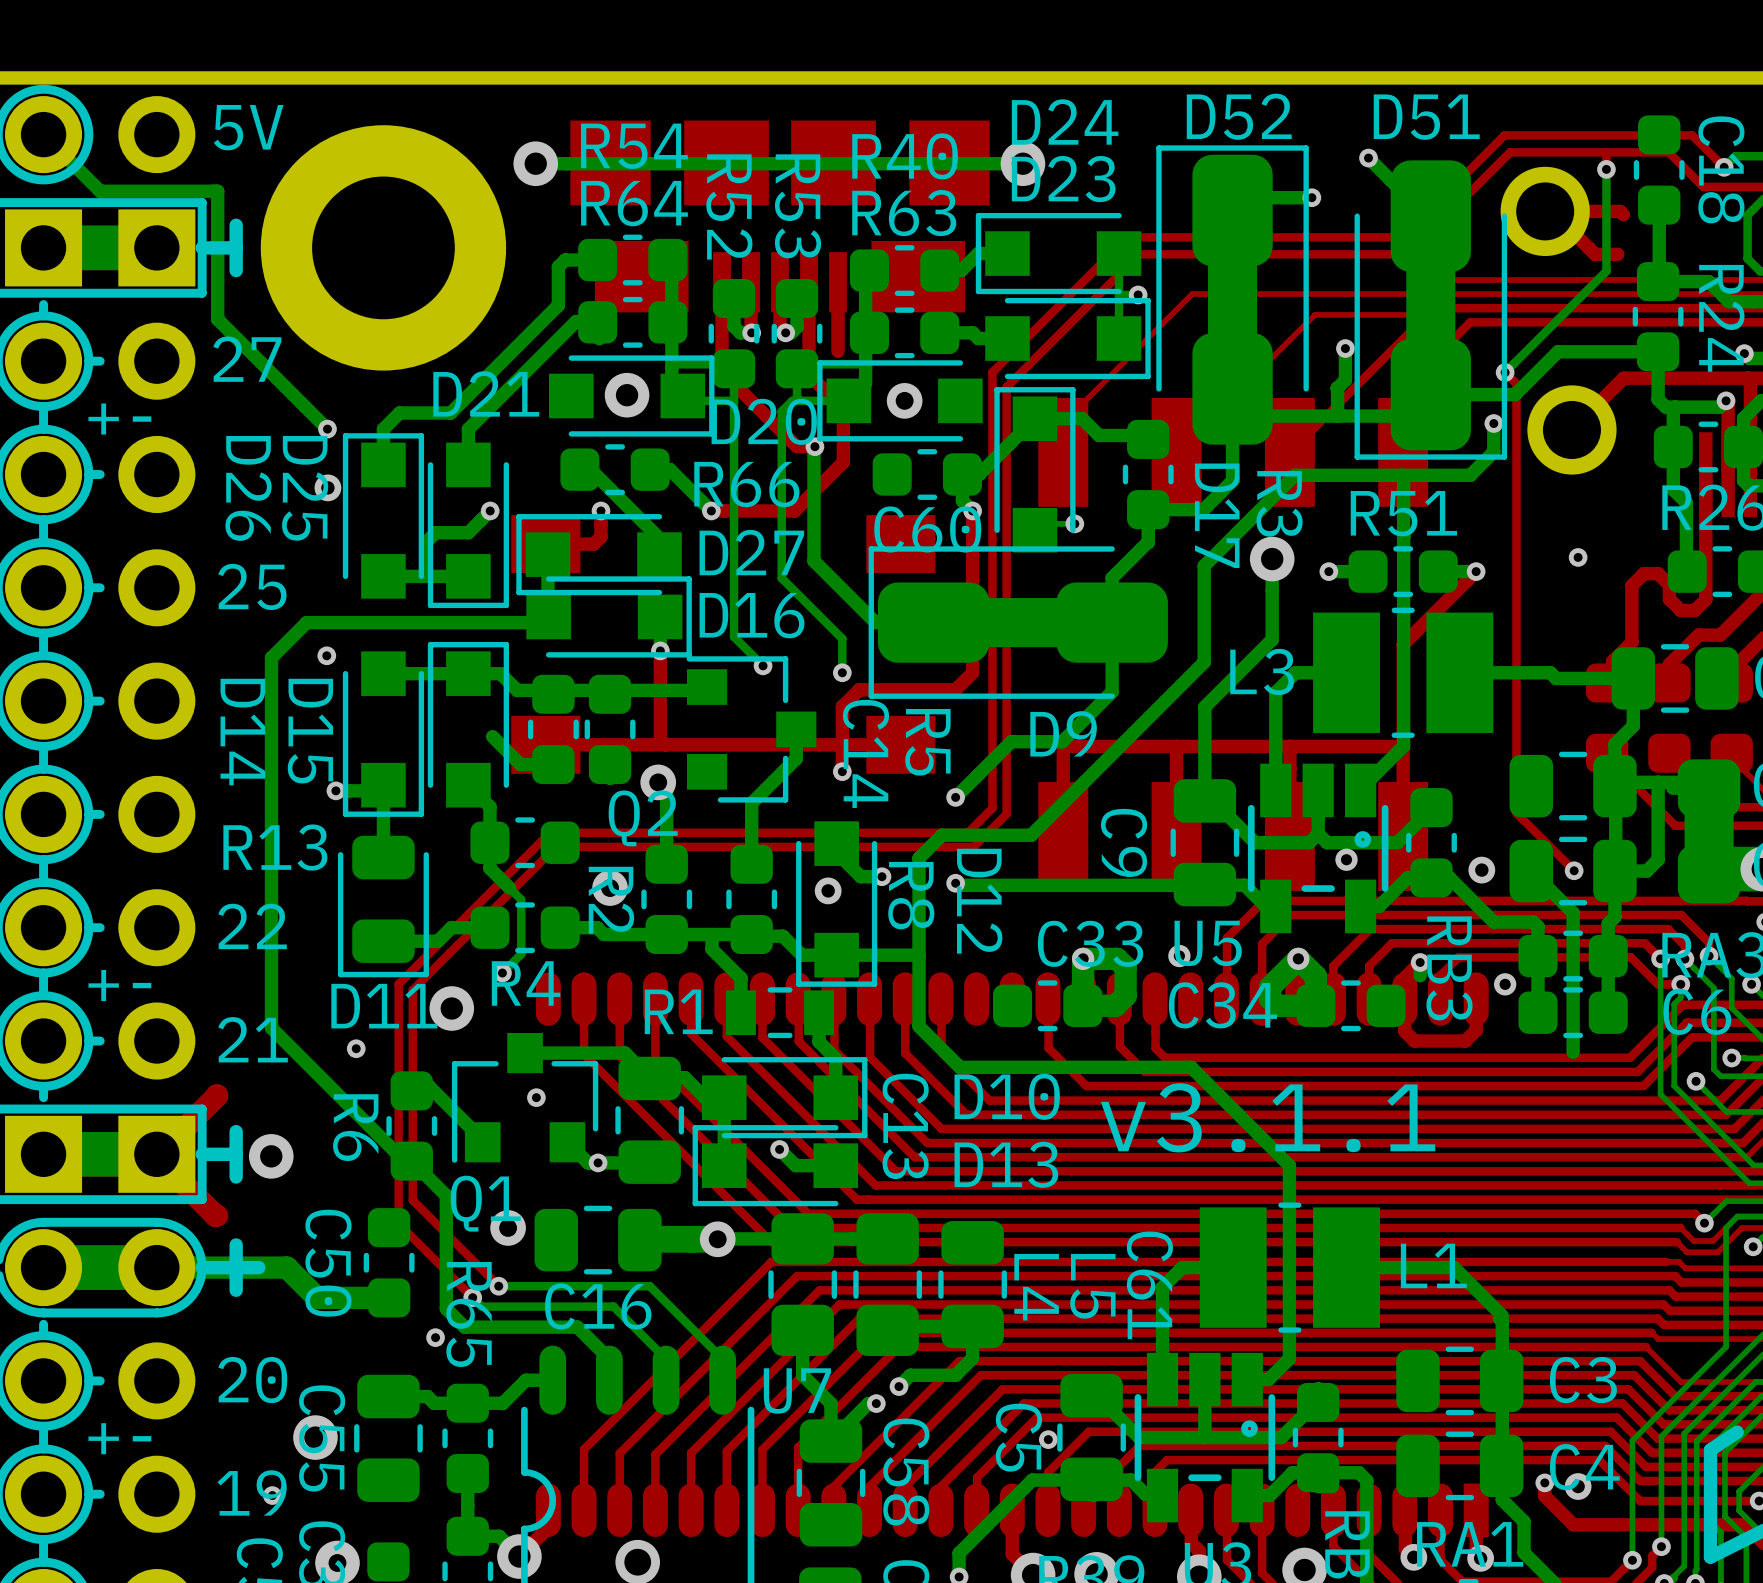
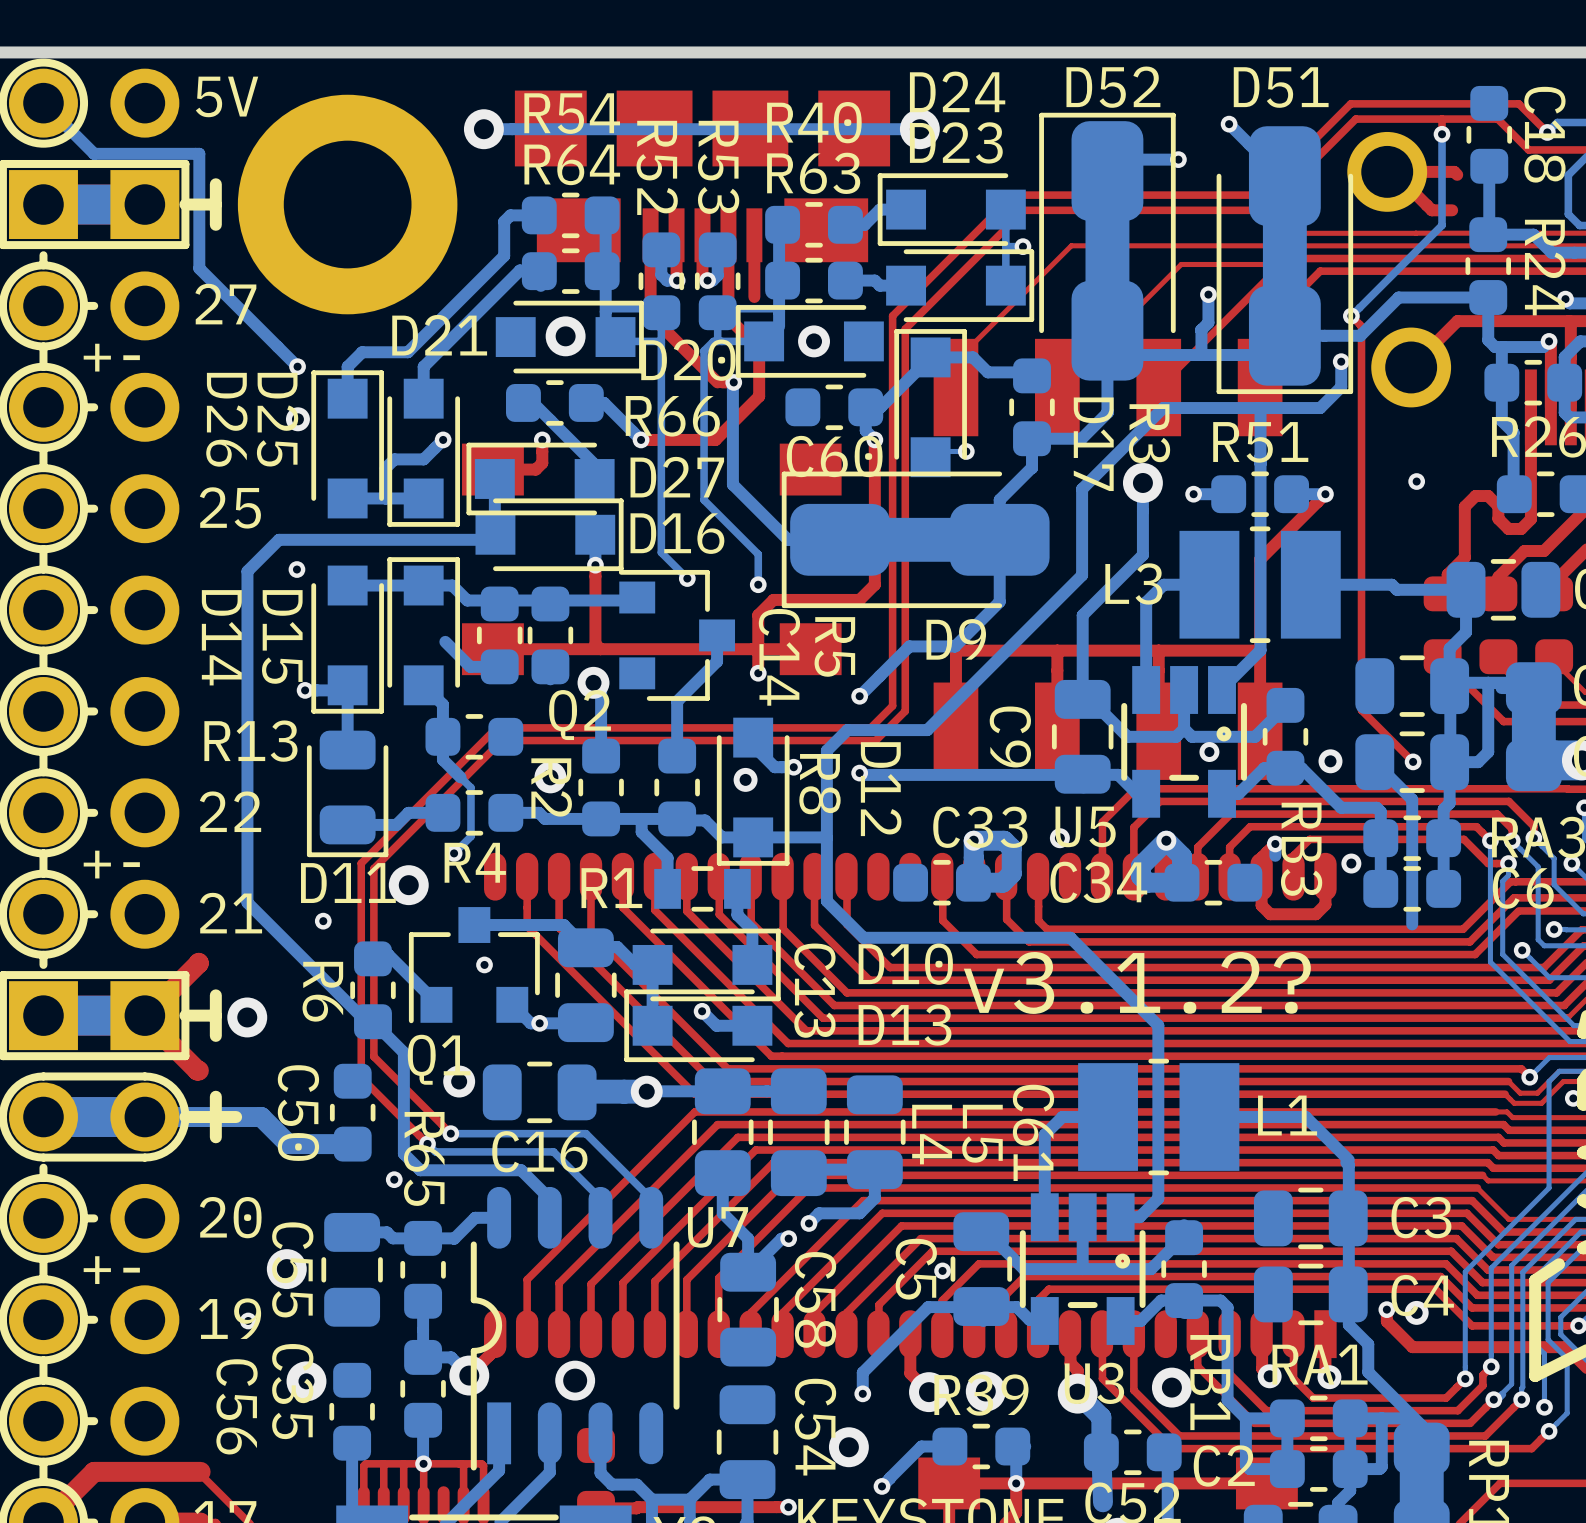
text: v3.1.1 (1268, 1117) -> v3.1.2? (1137, 982)

